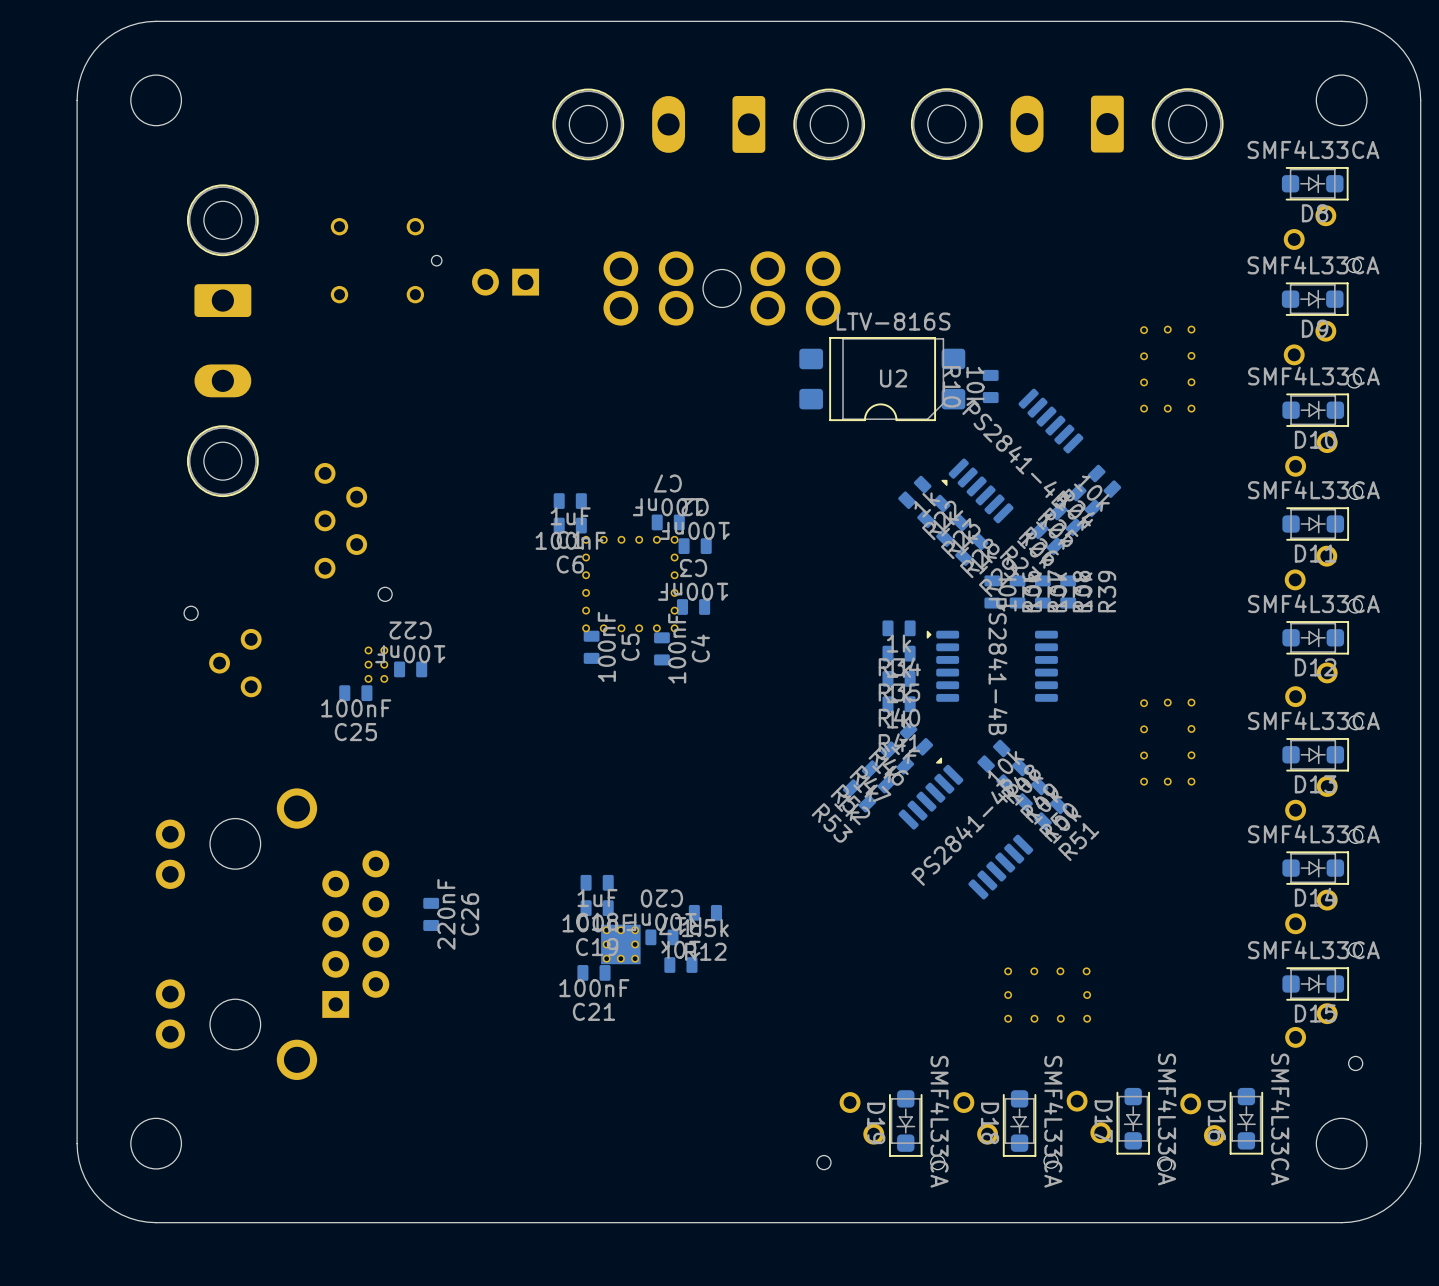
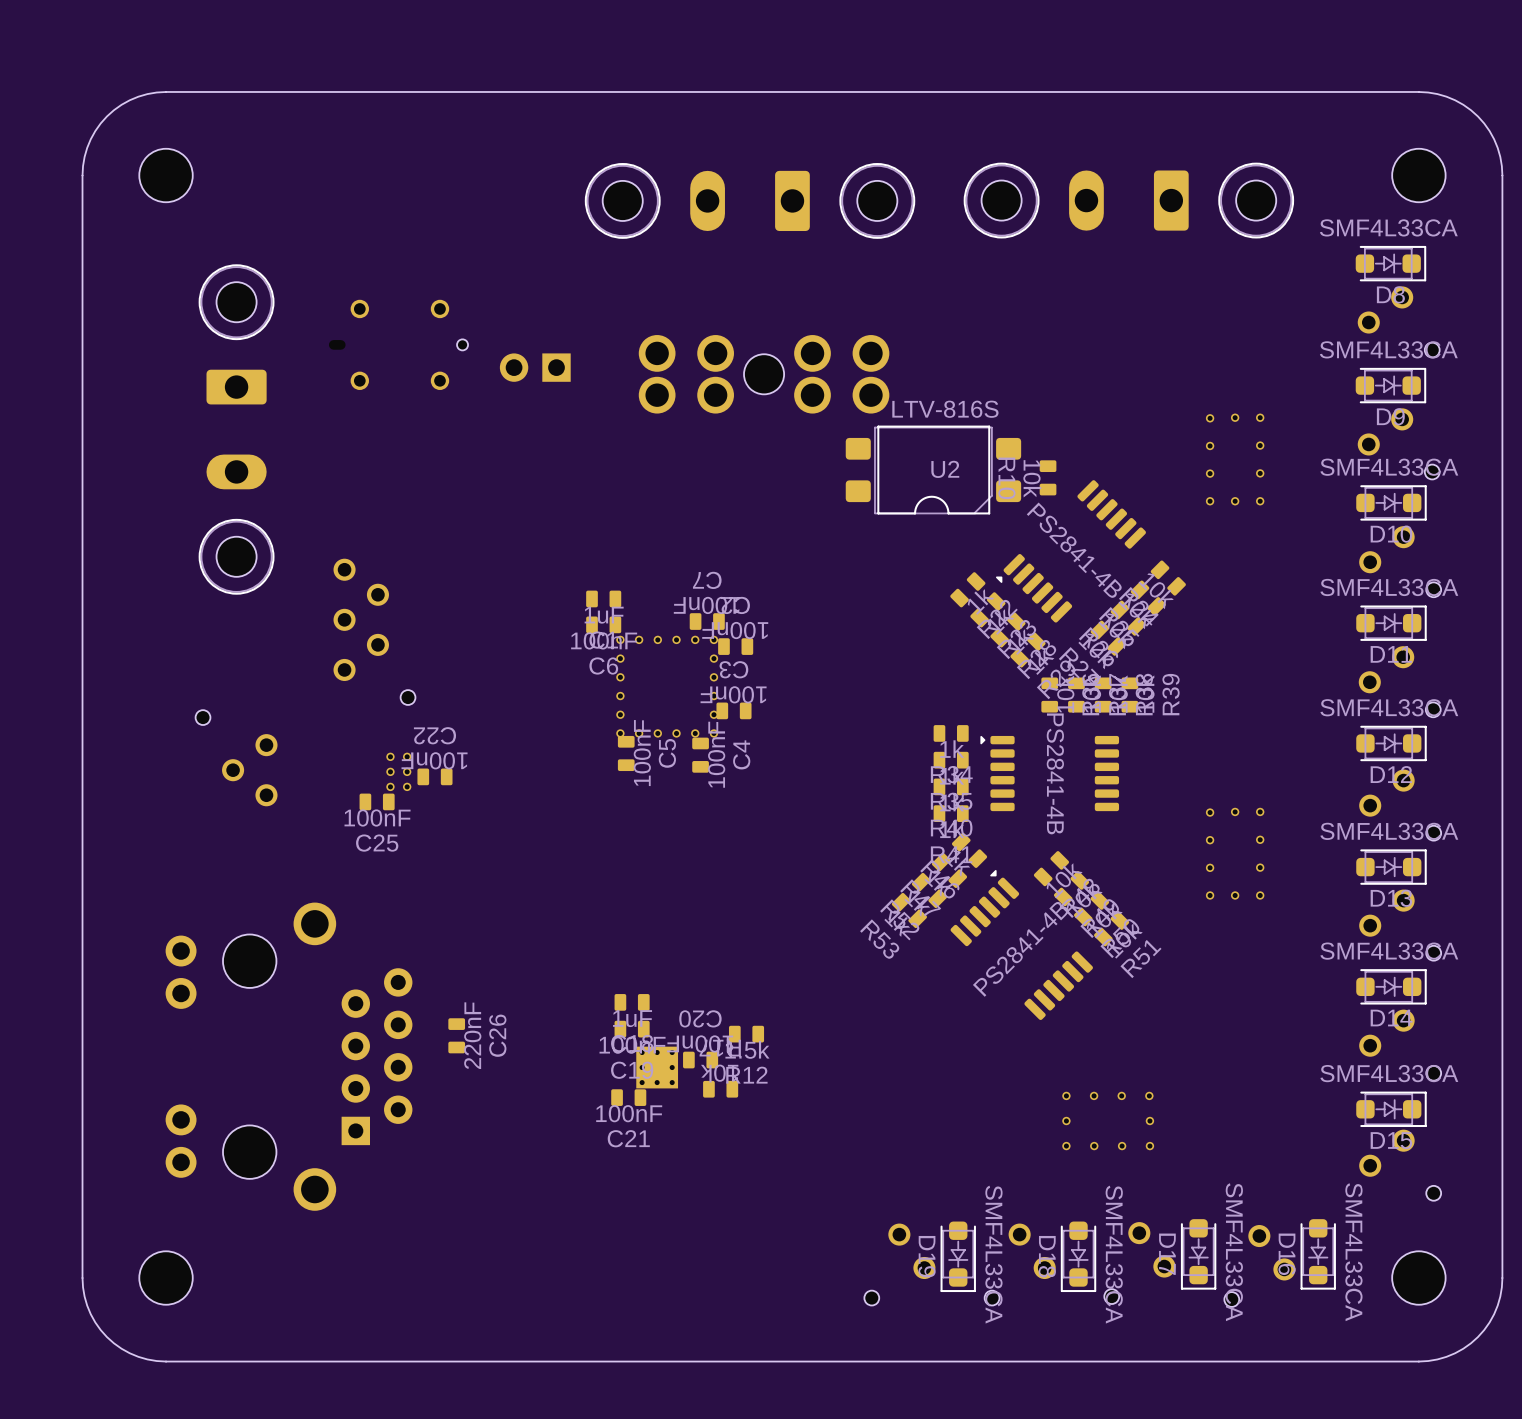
U2 footprint: [799, 337, 966, 422] -> [845, 425, 1022, 515]

